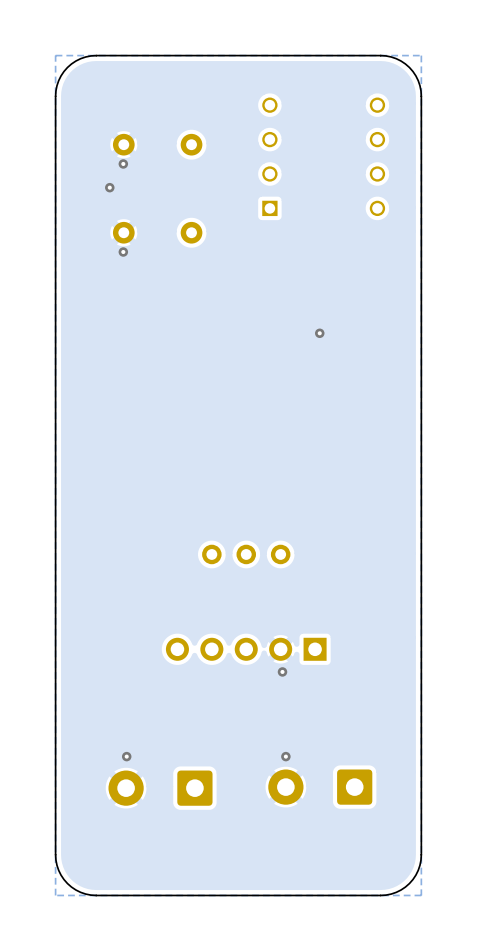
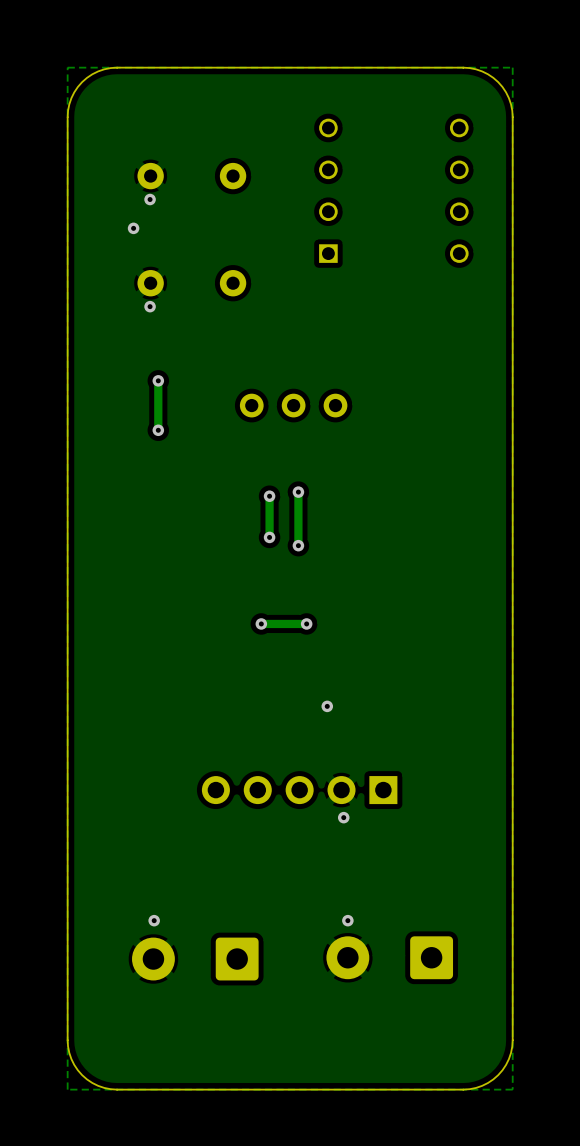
track: none -> (158, 380) (158, 430)
via: none -> (158, 380)
via: (319, 333) -> none
via: none -> (158, 430)
track: none -> (298, 492) (298, 545)
via: none -> (298, 492)
track: none -> (269, 496) (269, 537)
via: none -> (269, 496)
via: none -> (269, 537)
via: none -> (298, 545)
via: none -> (261, 623)
track: none -> (306, 623) (261, 623)
via: none -> (306, 623)
part position: (246, 554) -> (293, 405)
via: none -> (327, 706)

